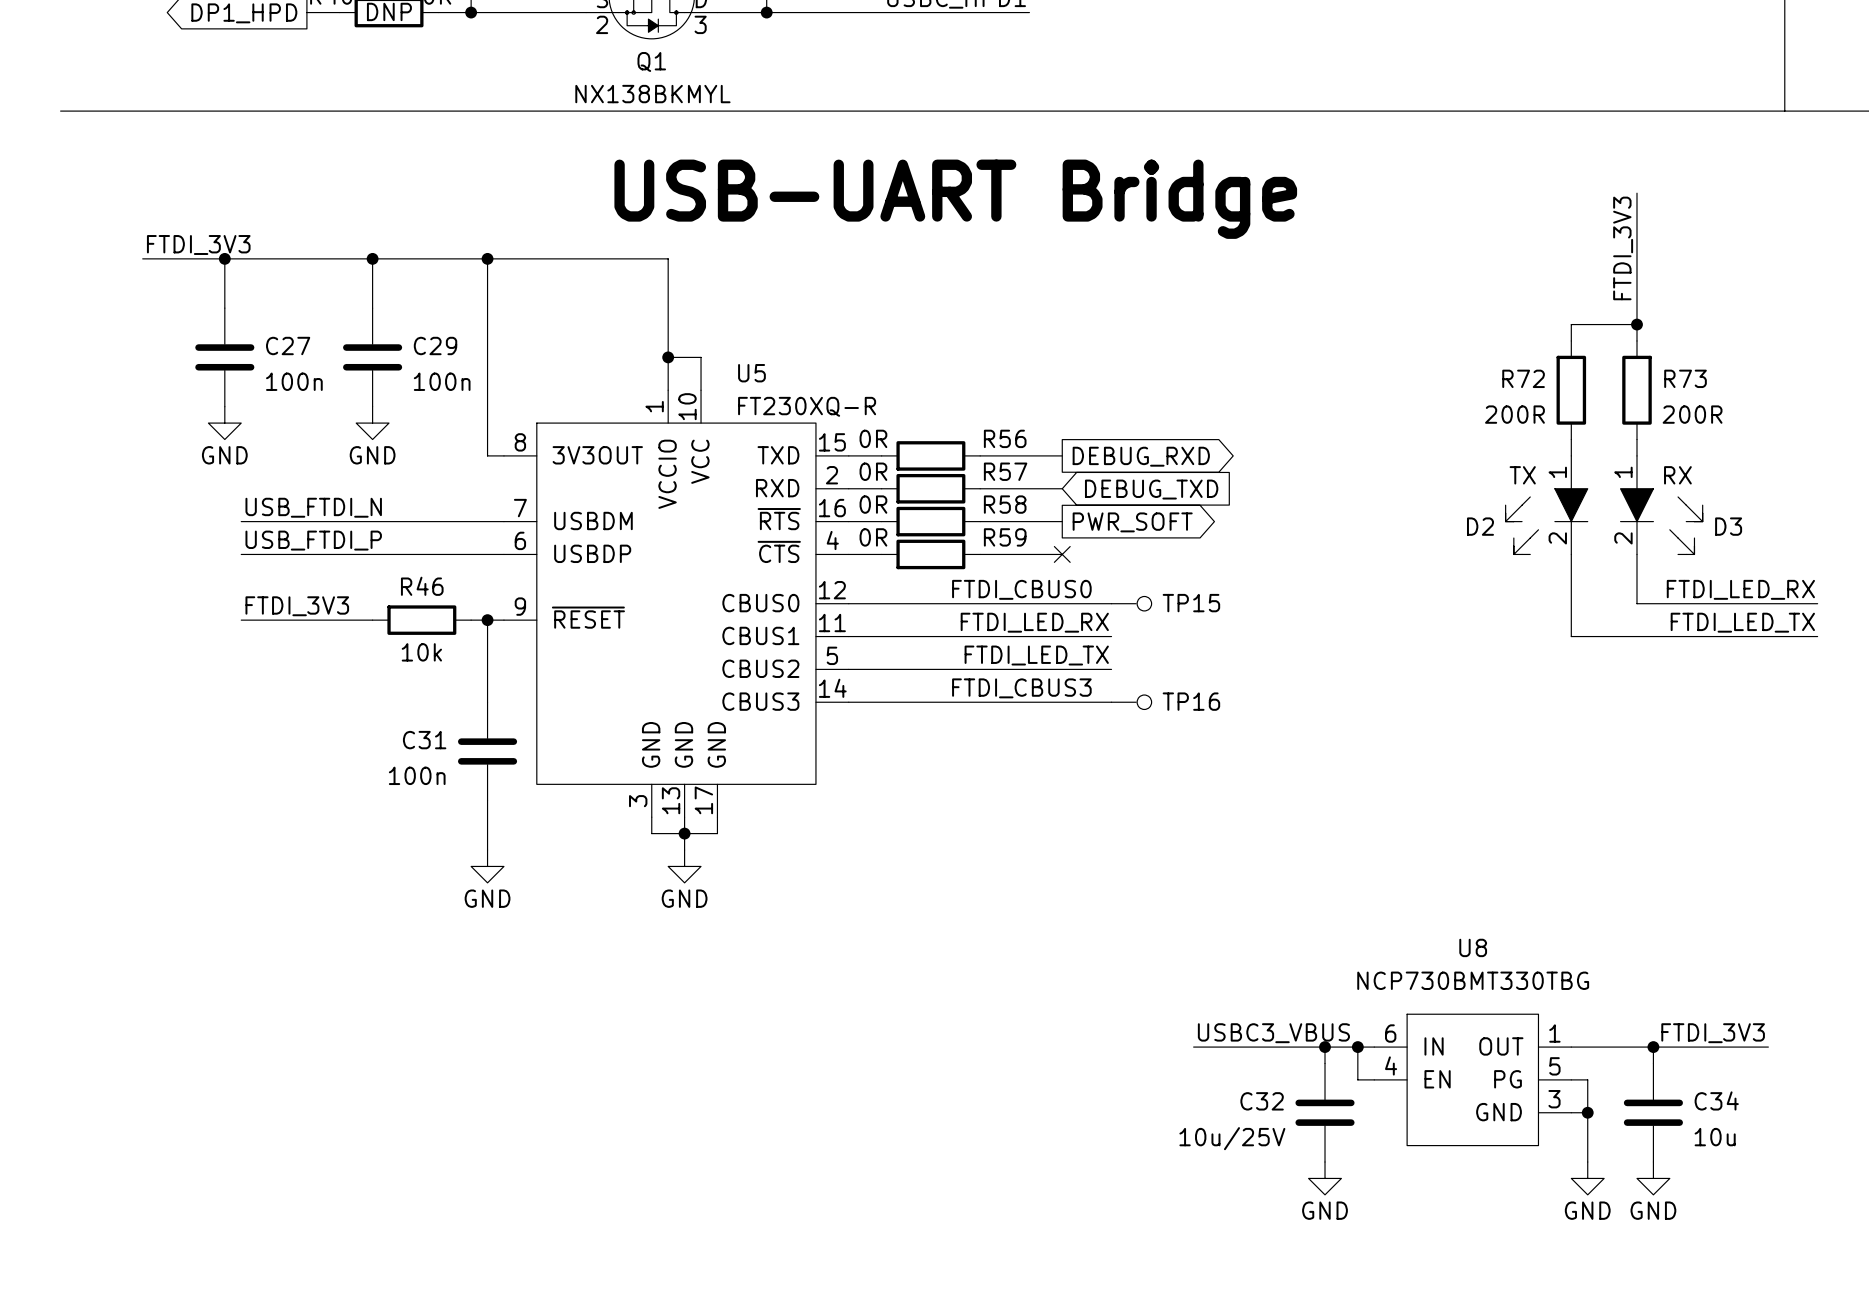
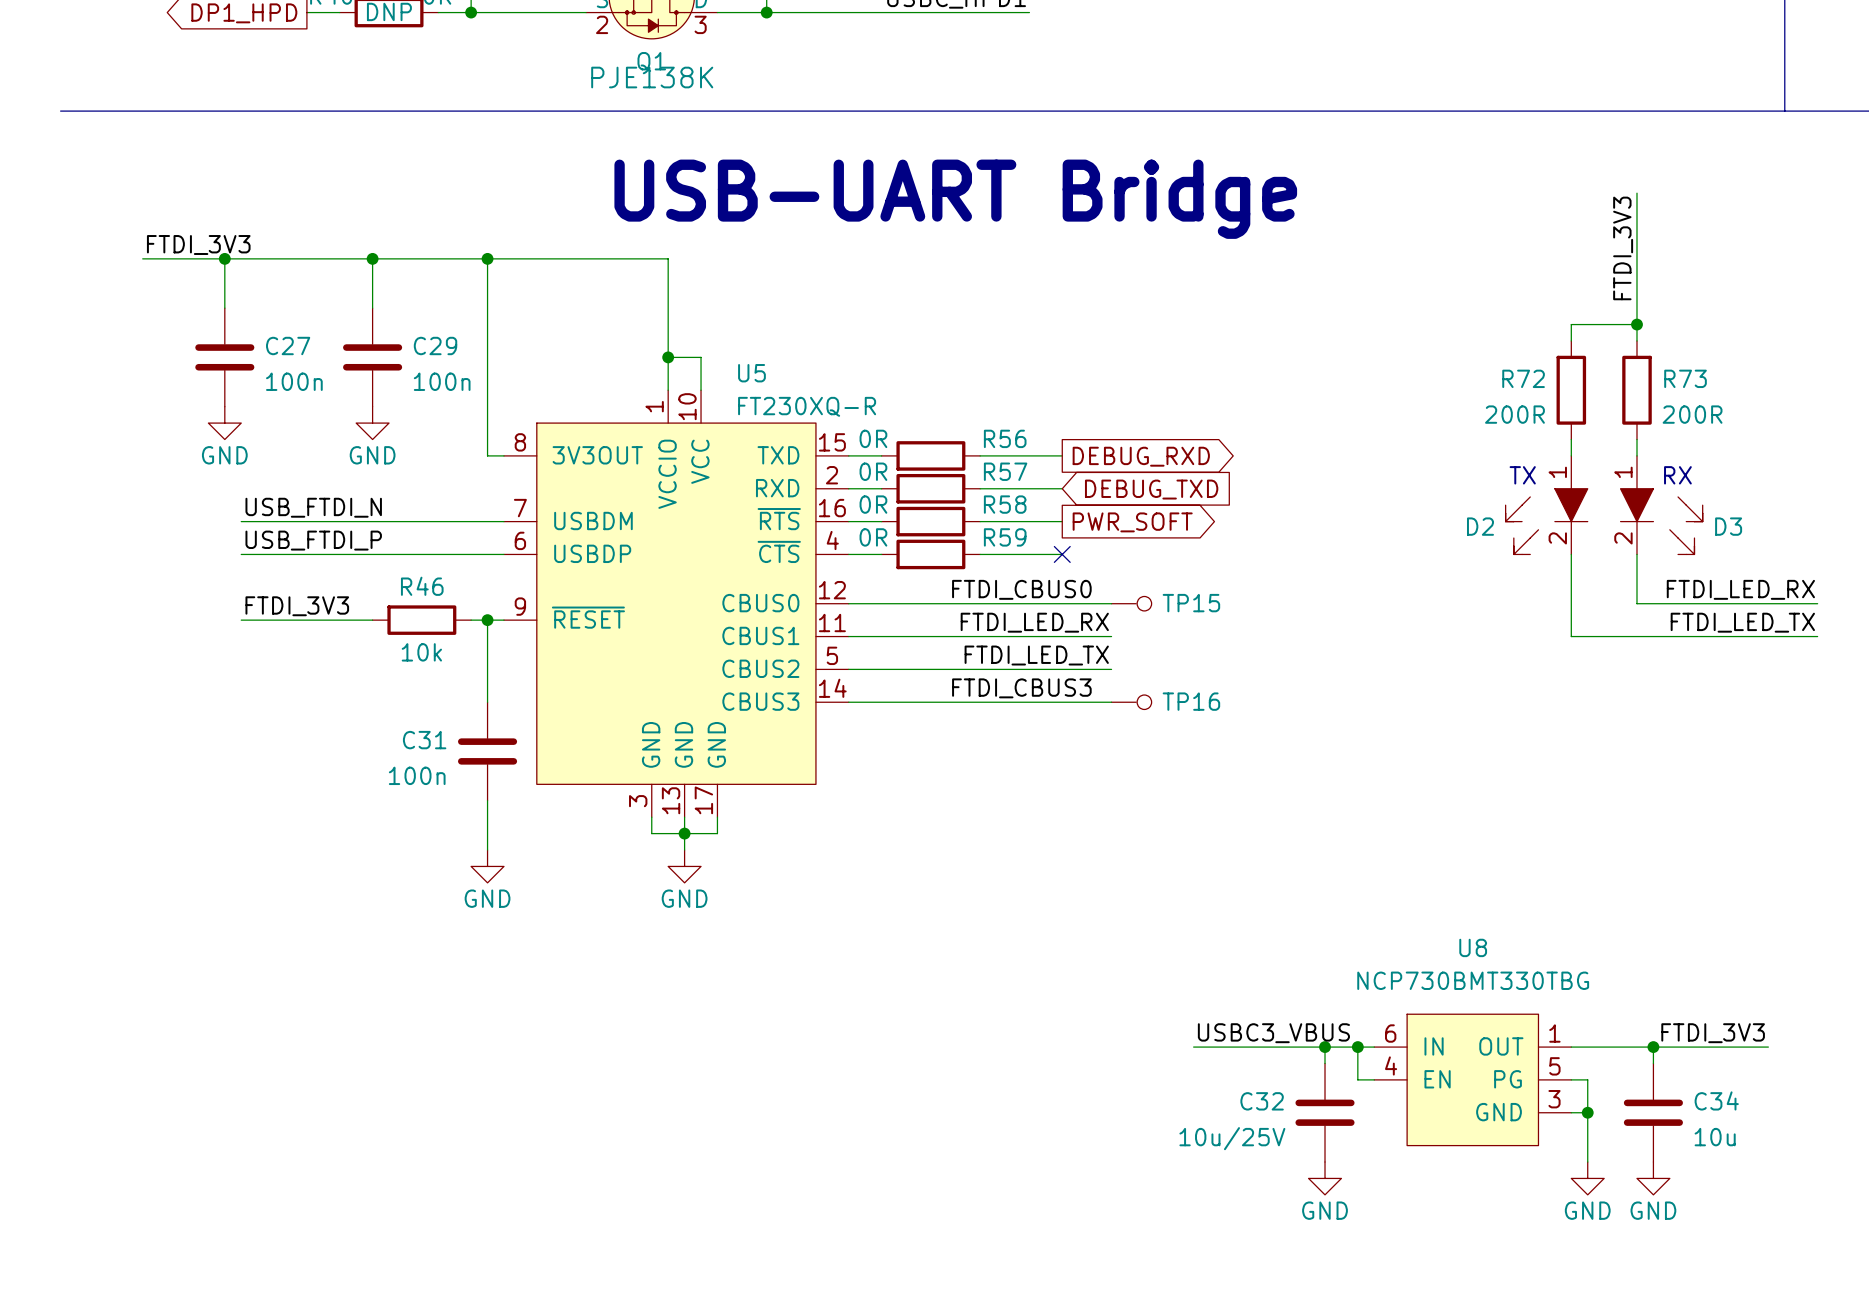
Q1 value: NX138BKMYL (652, 94) -> PJE138K (652, 77)

